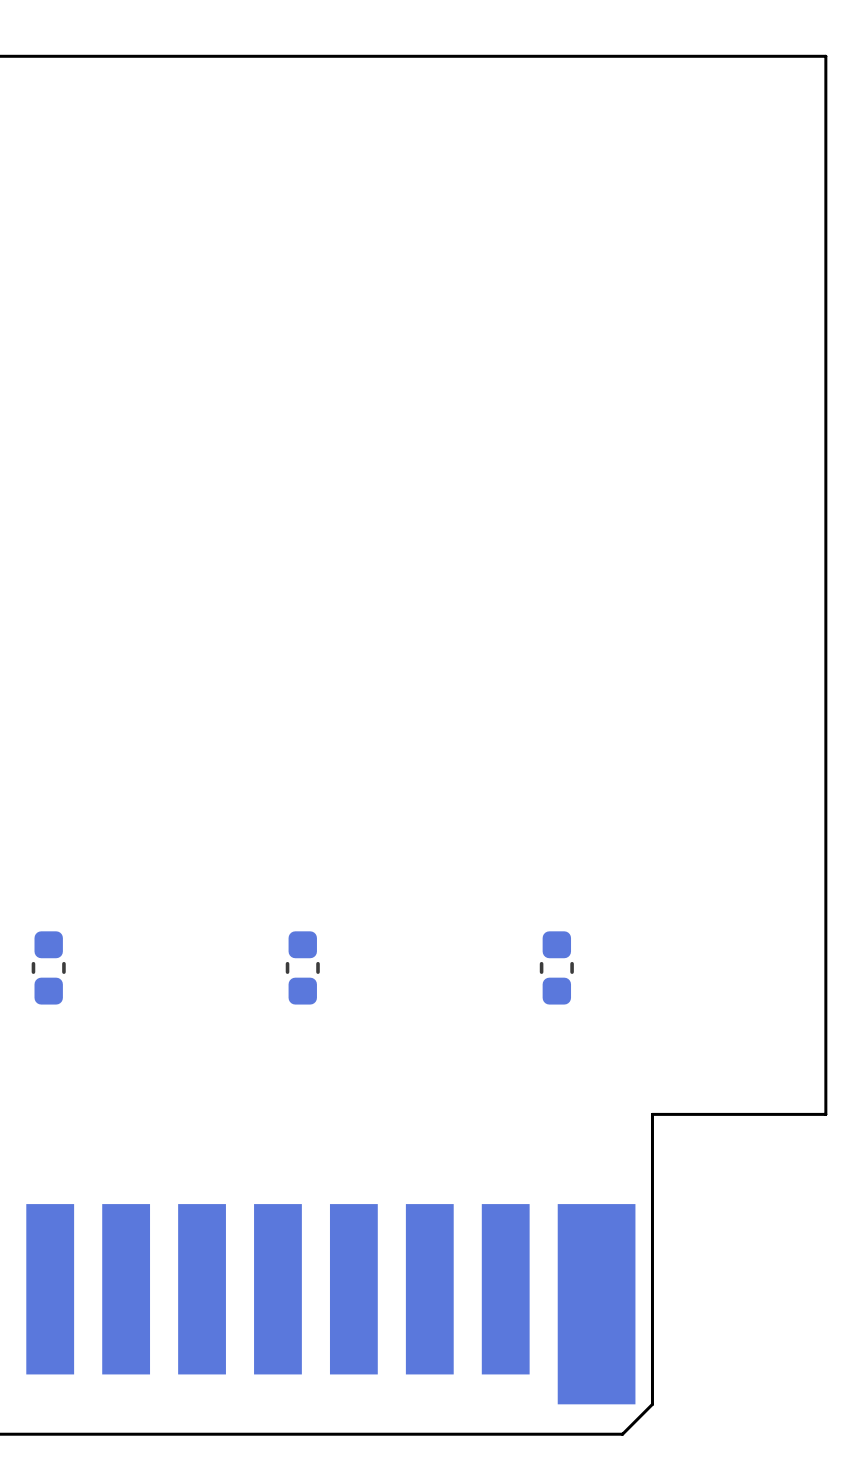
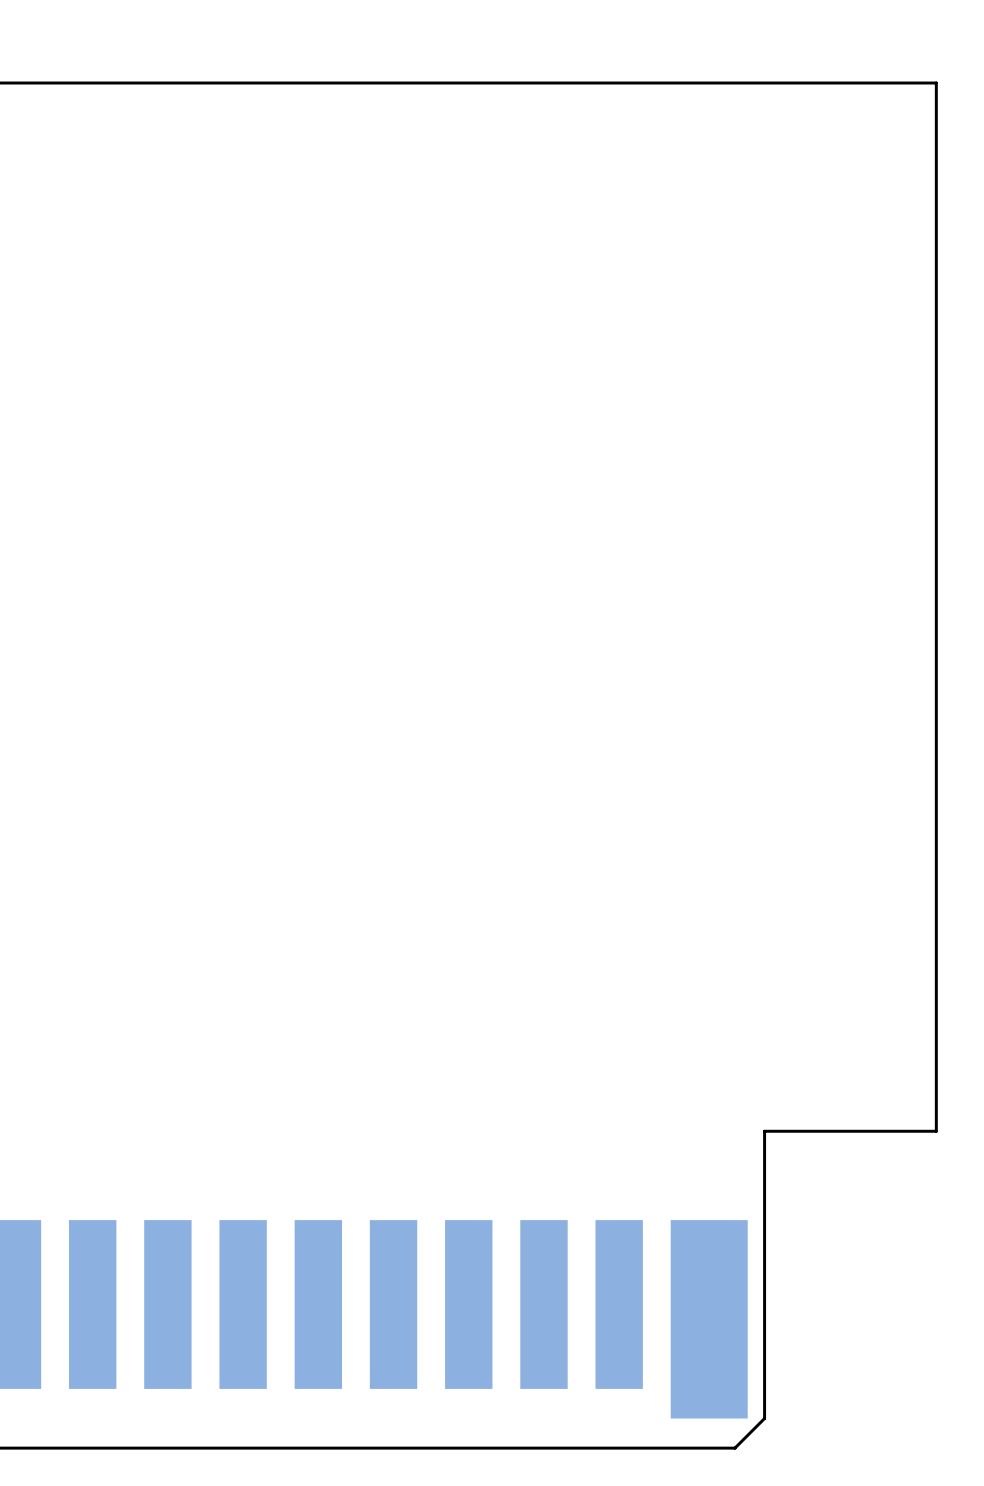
part: (48, 967) -> none
part: (302, 967) -> none
part: (556, 967) -> none

